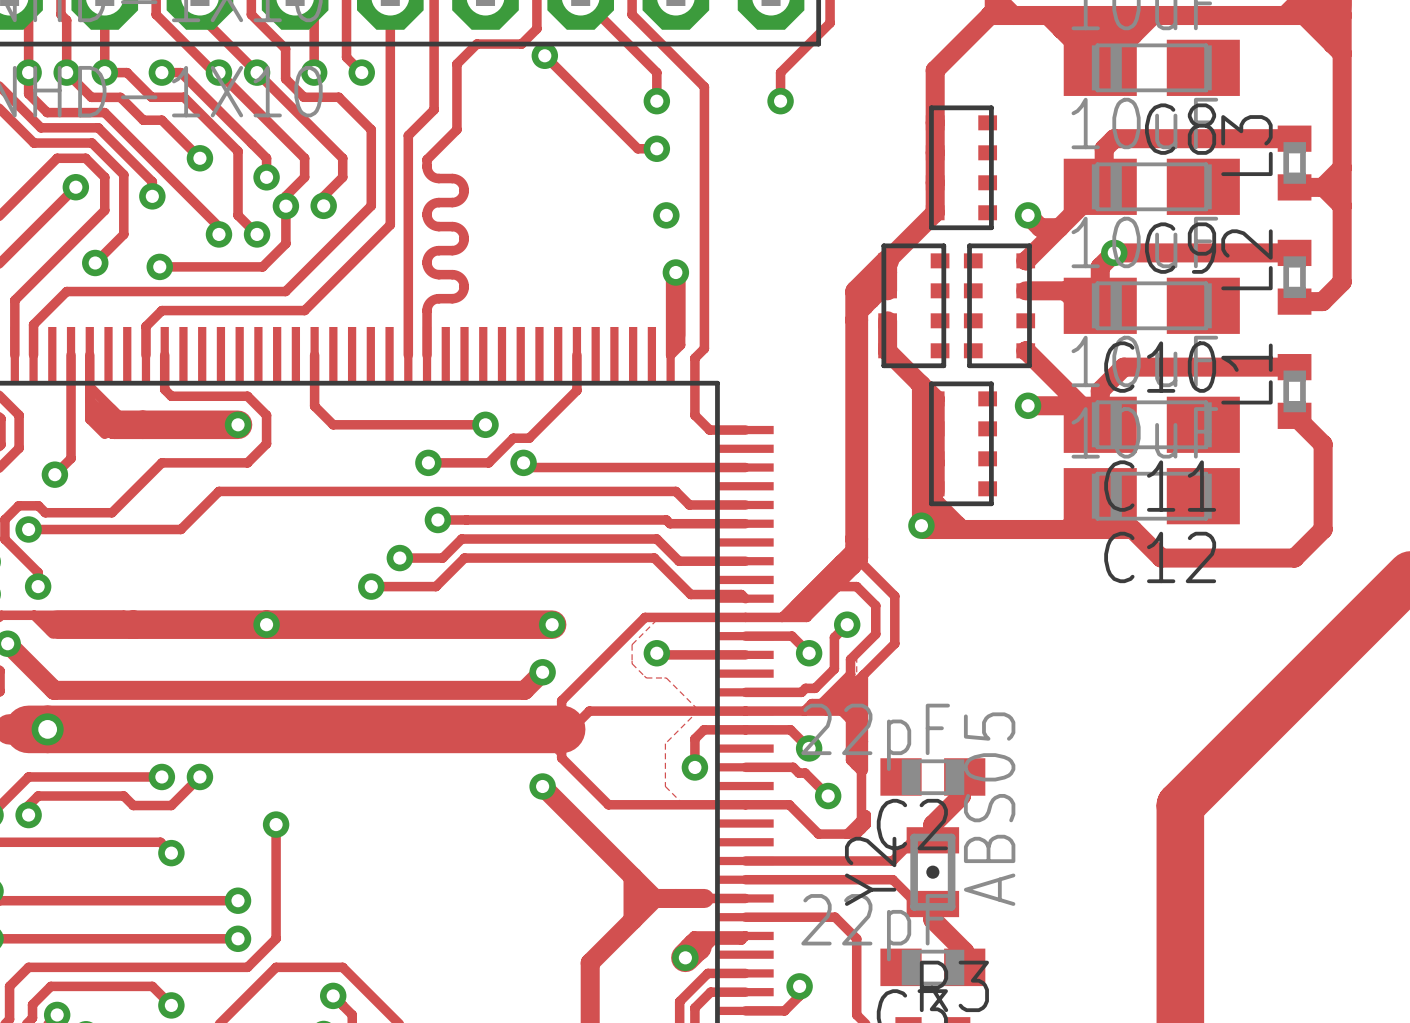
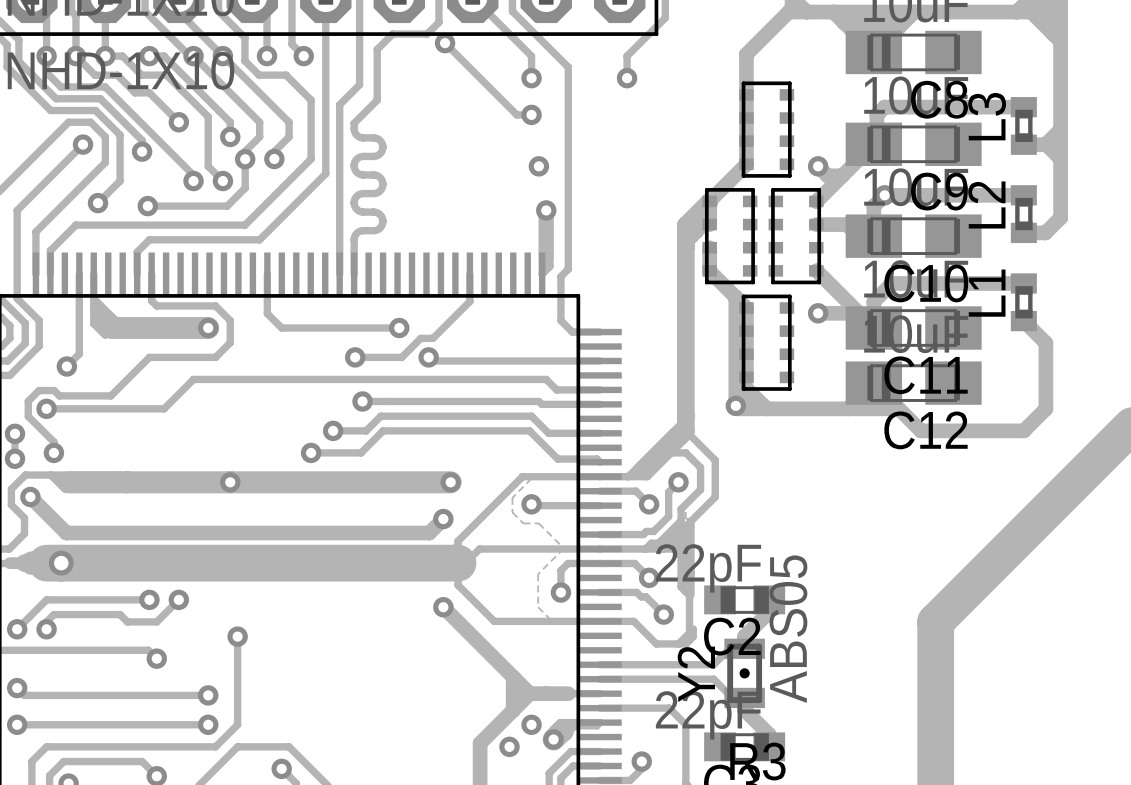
via: none -> (531, 724)
via: none -> (509, 746)

